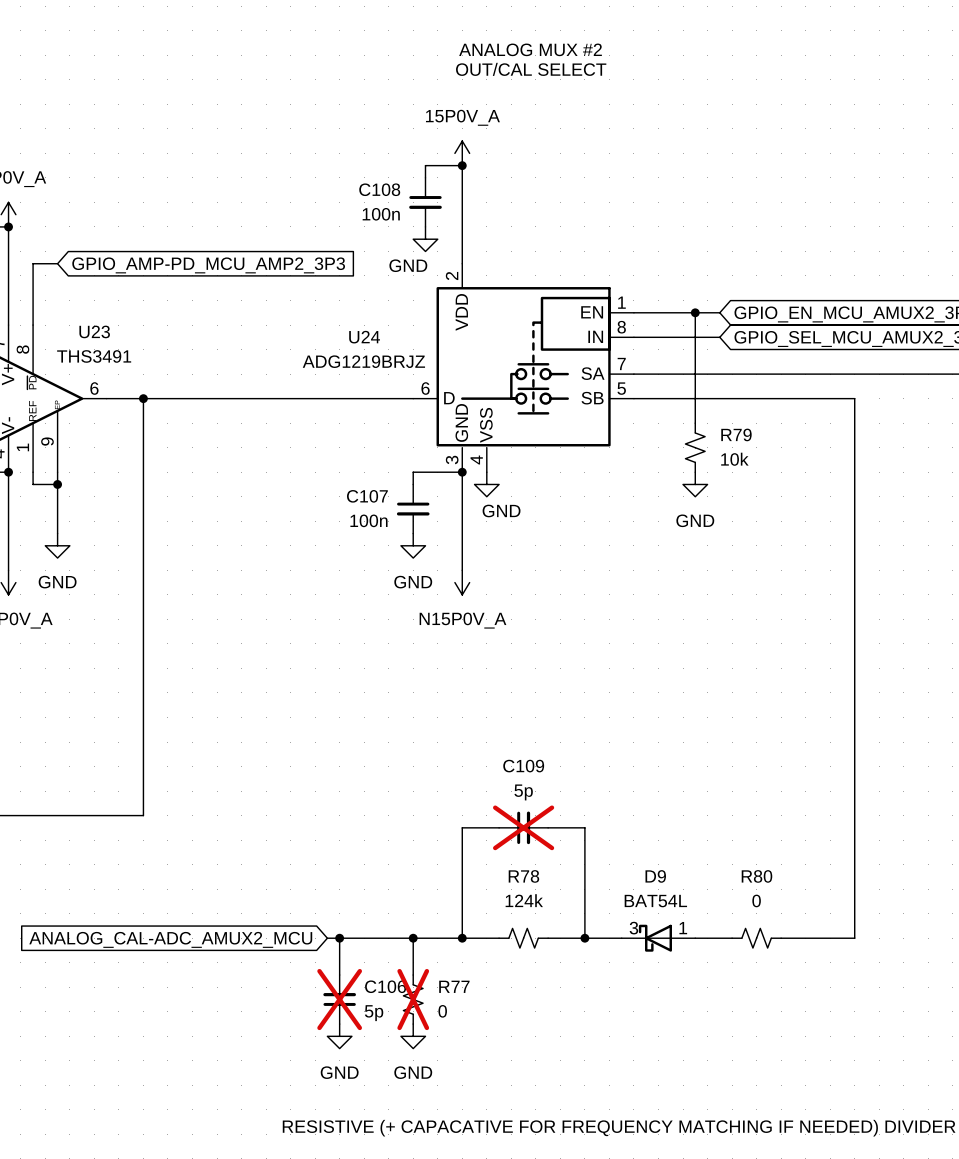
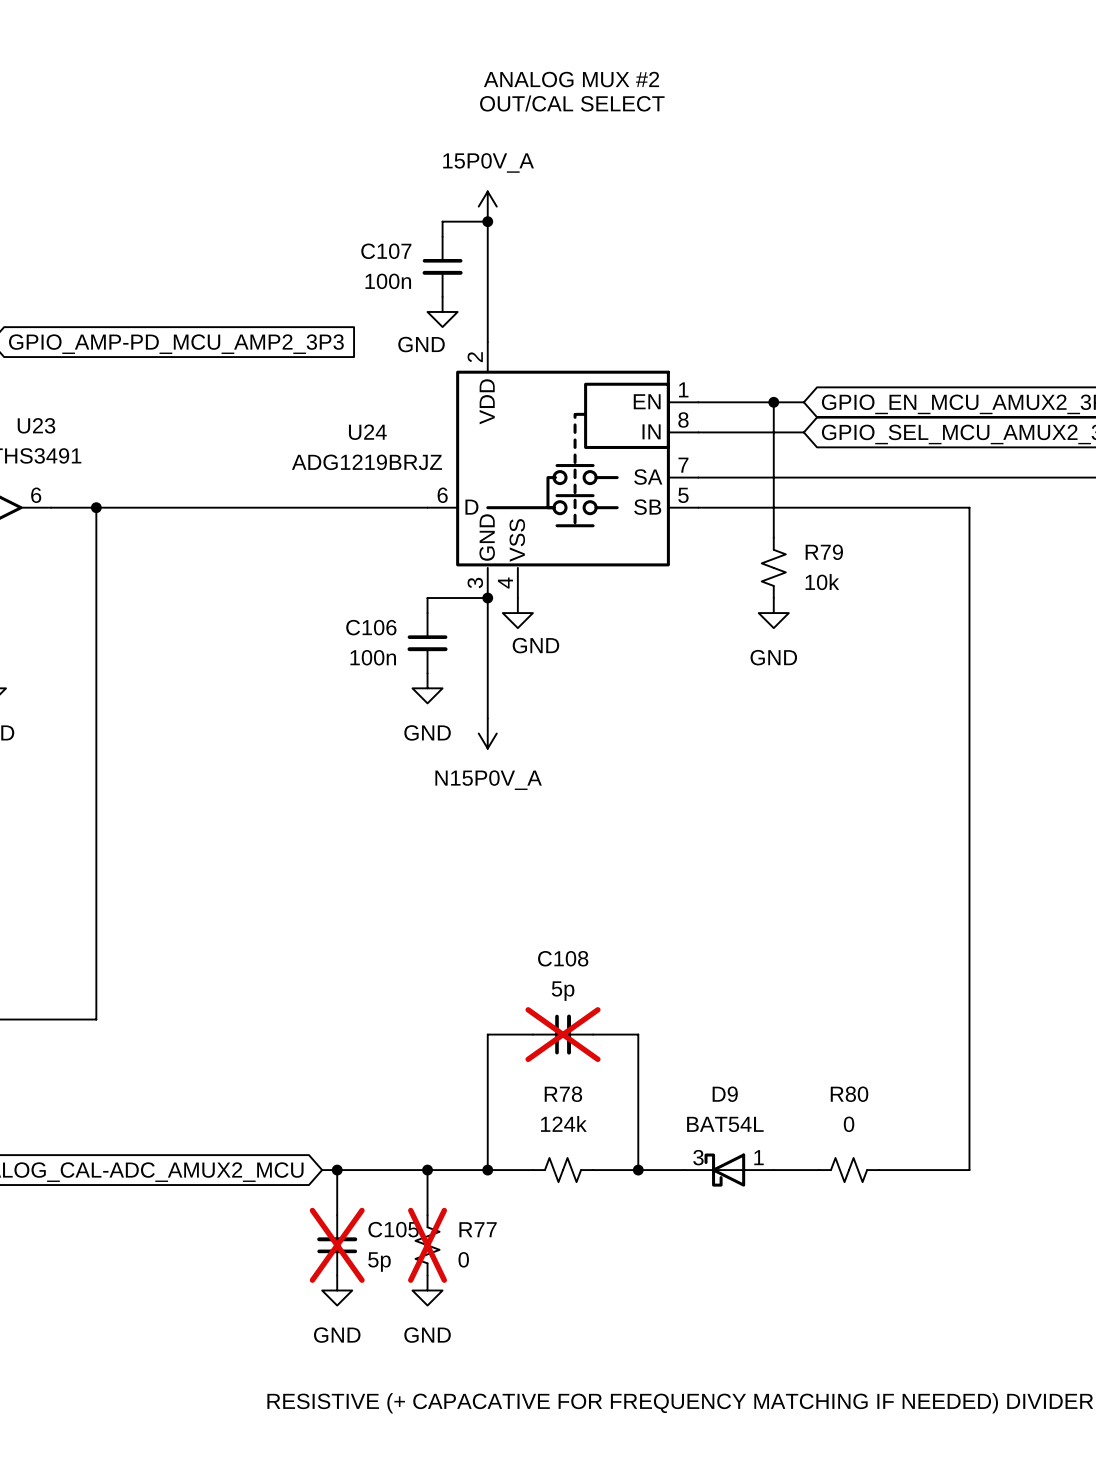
C108 name: C108 (379, 189) -> C107 (386, 251)
C107 name: C107 (367, 496) -> C106 (371, 627)
C109 name: C109 (523, 766) -> C108 (563, 958)
C106 name: C106 (385, 986) -> C105 (393, 1229)

